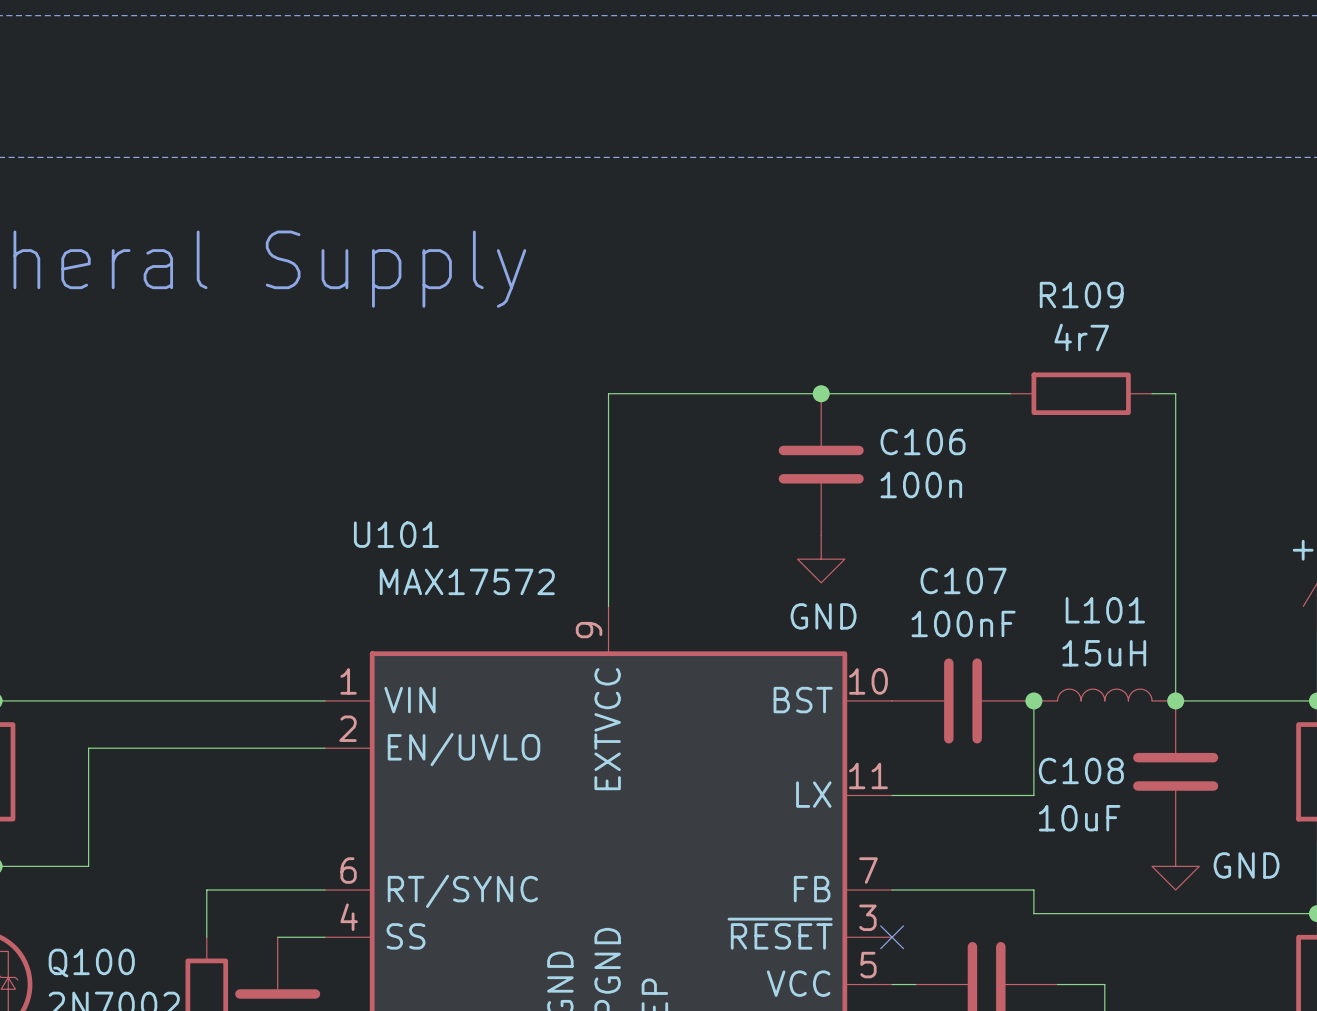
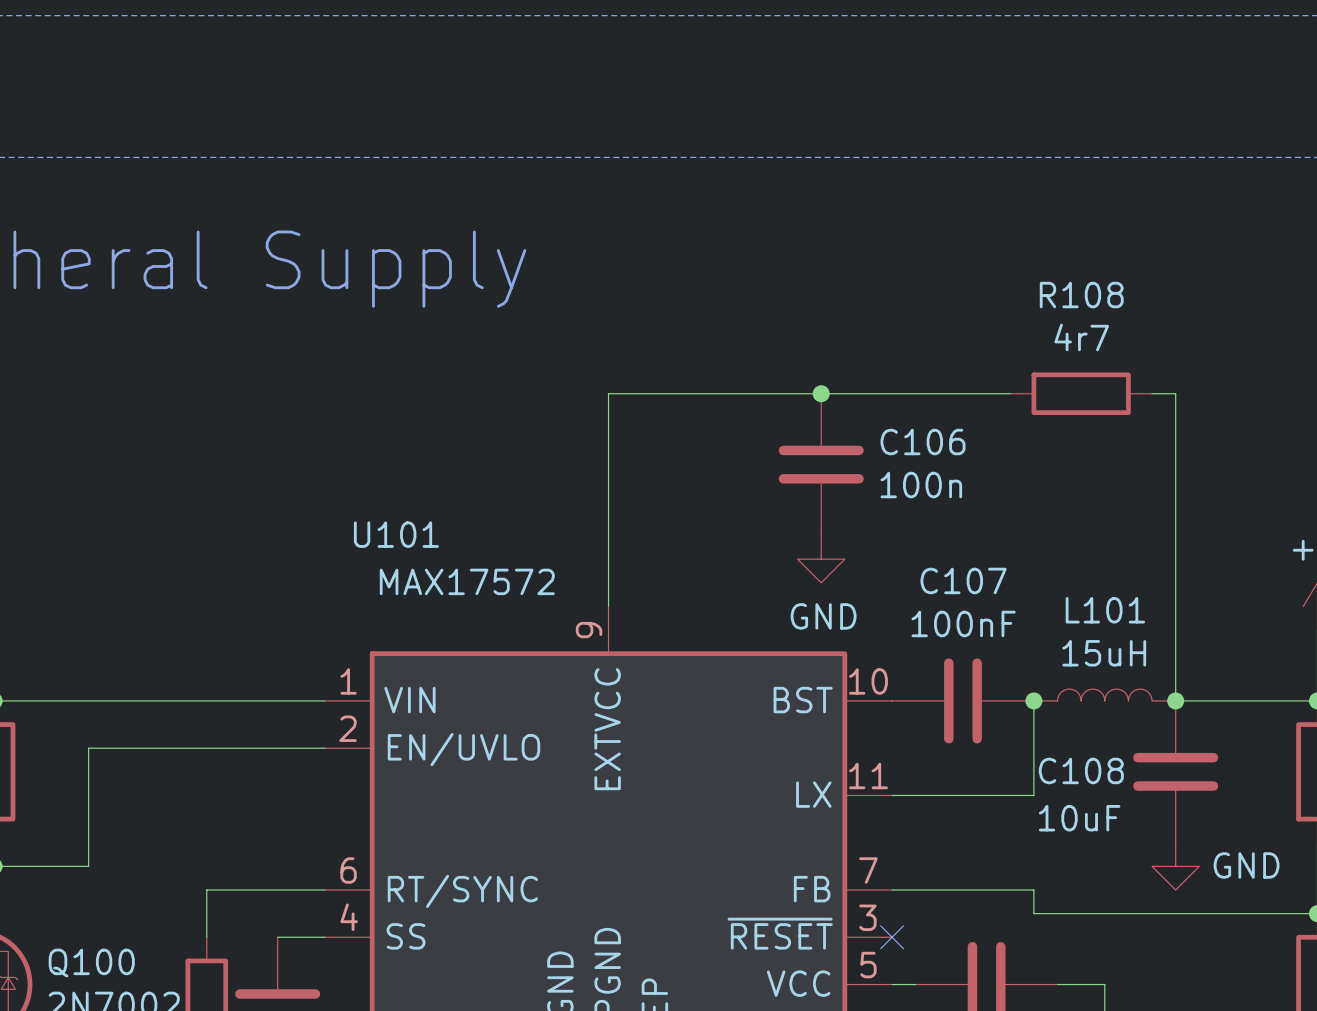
R109 name: R109 (1081, 295) -> R108 (1081, 295)

